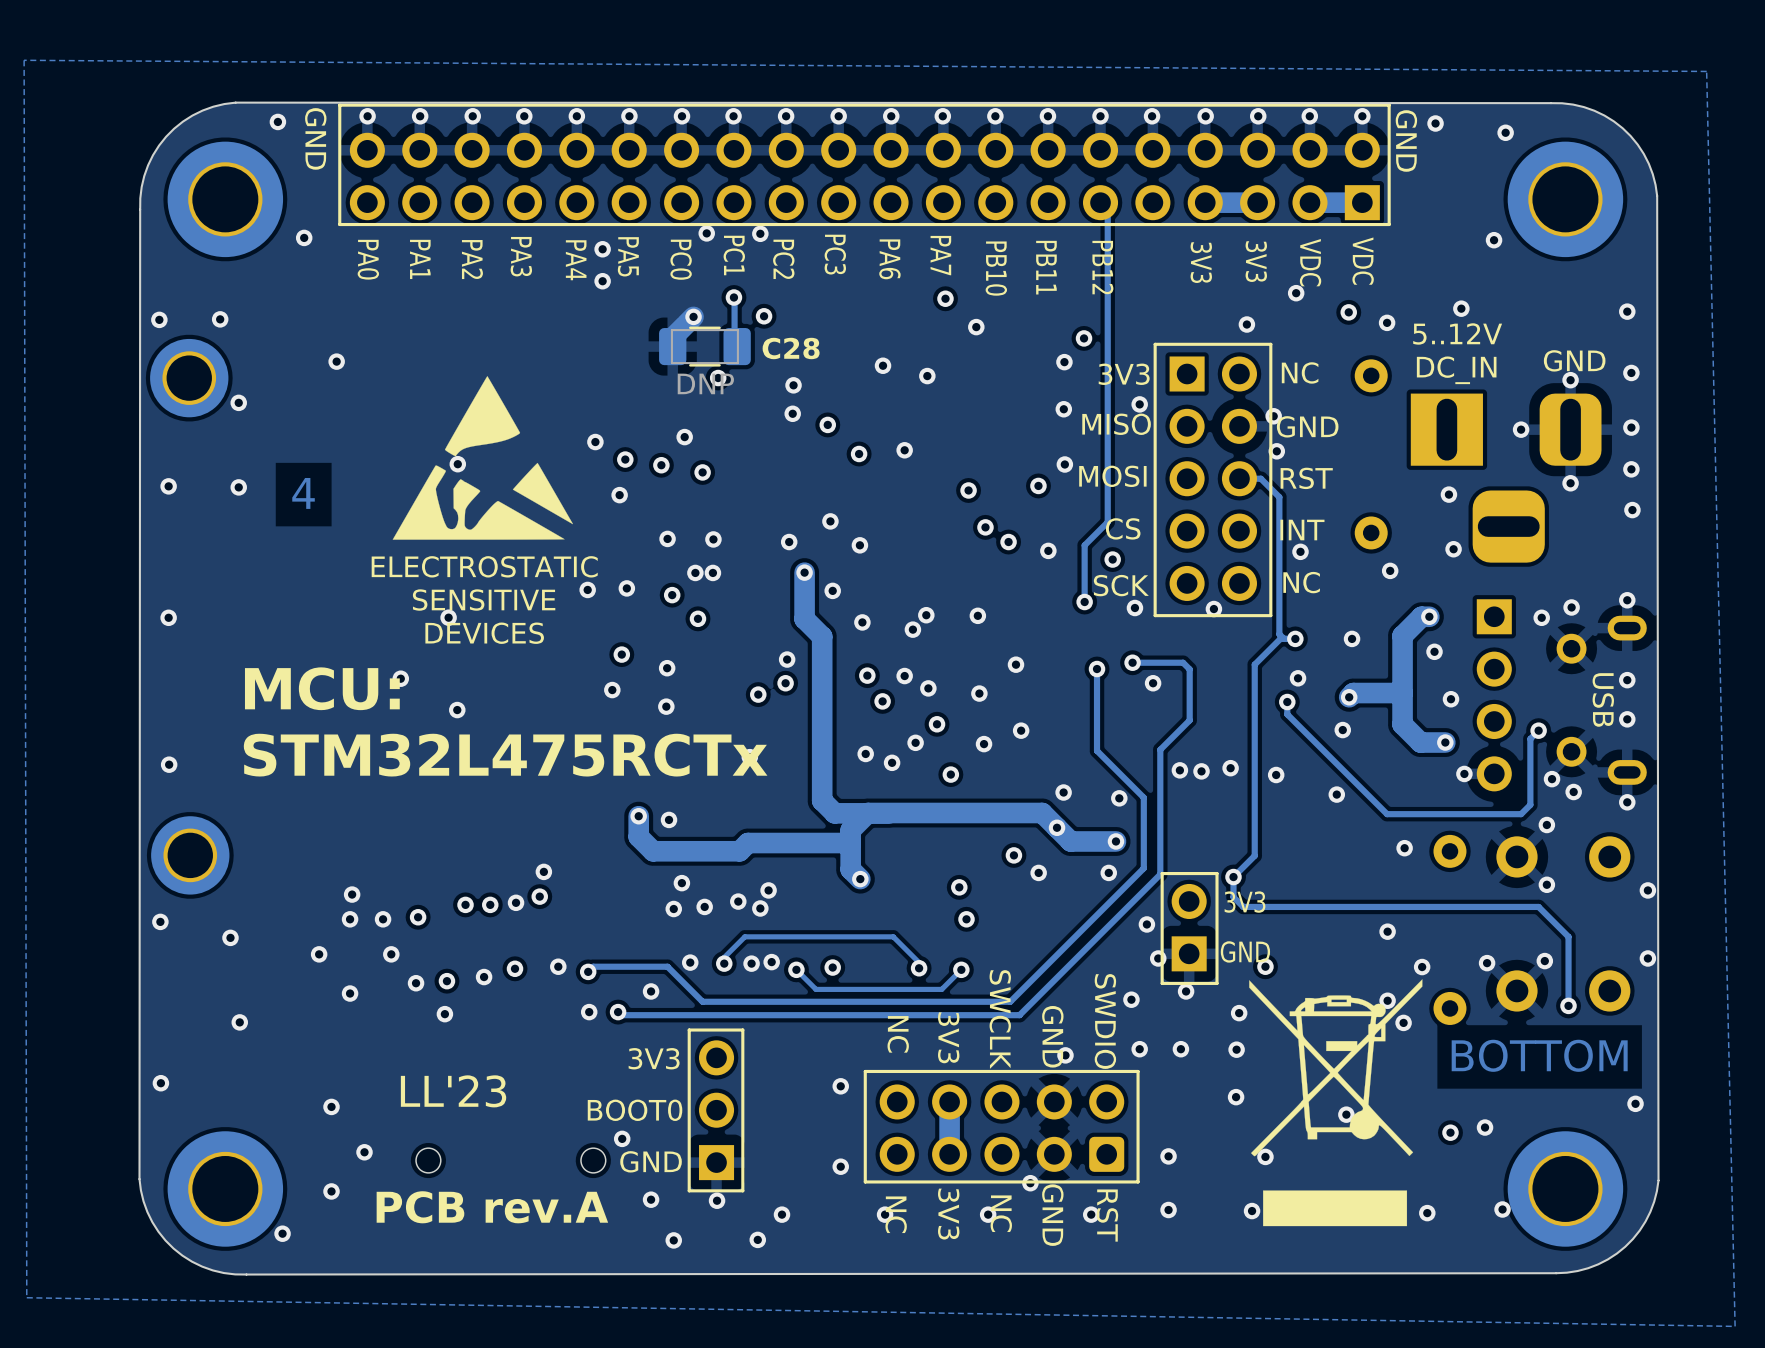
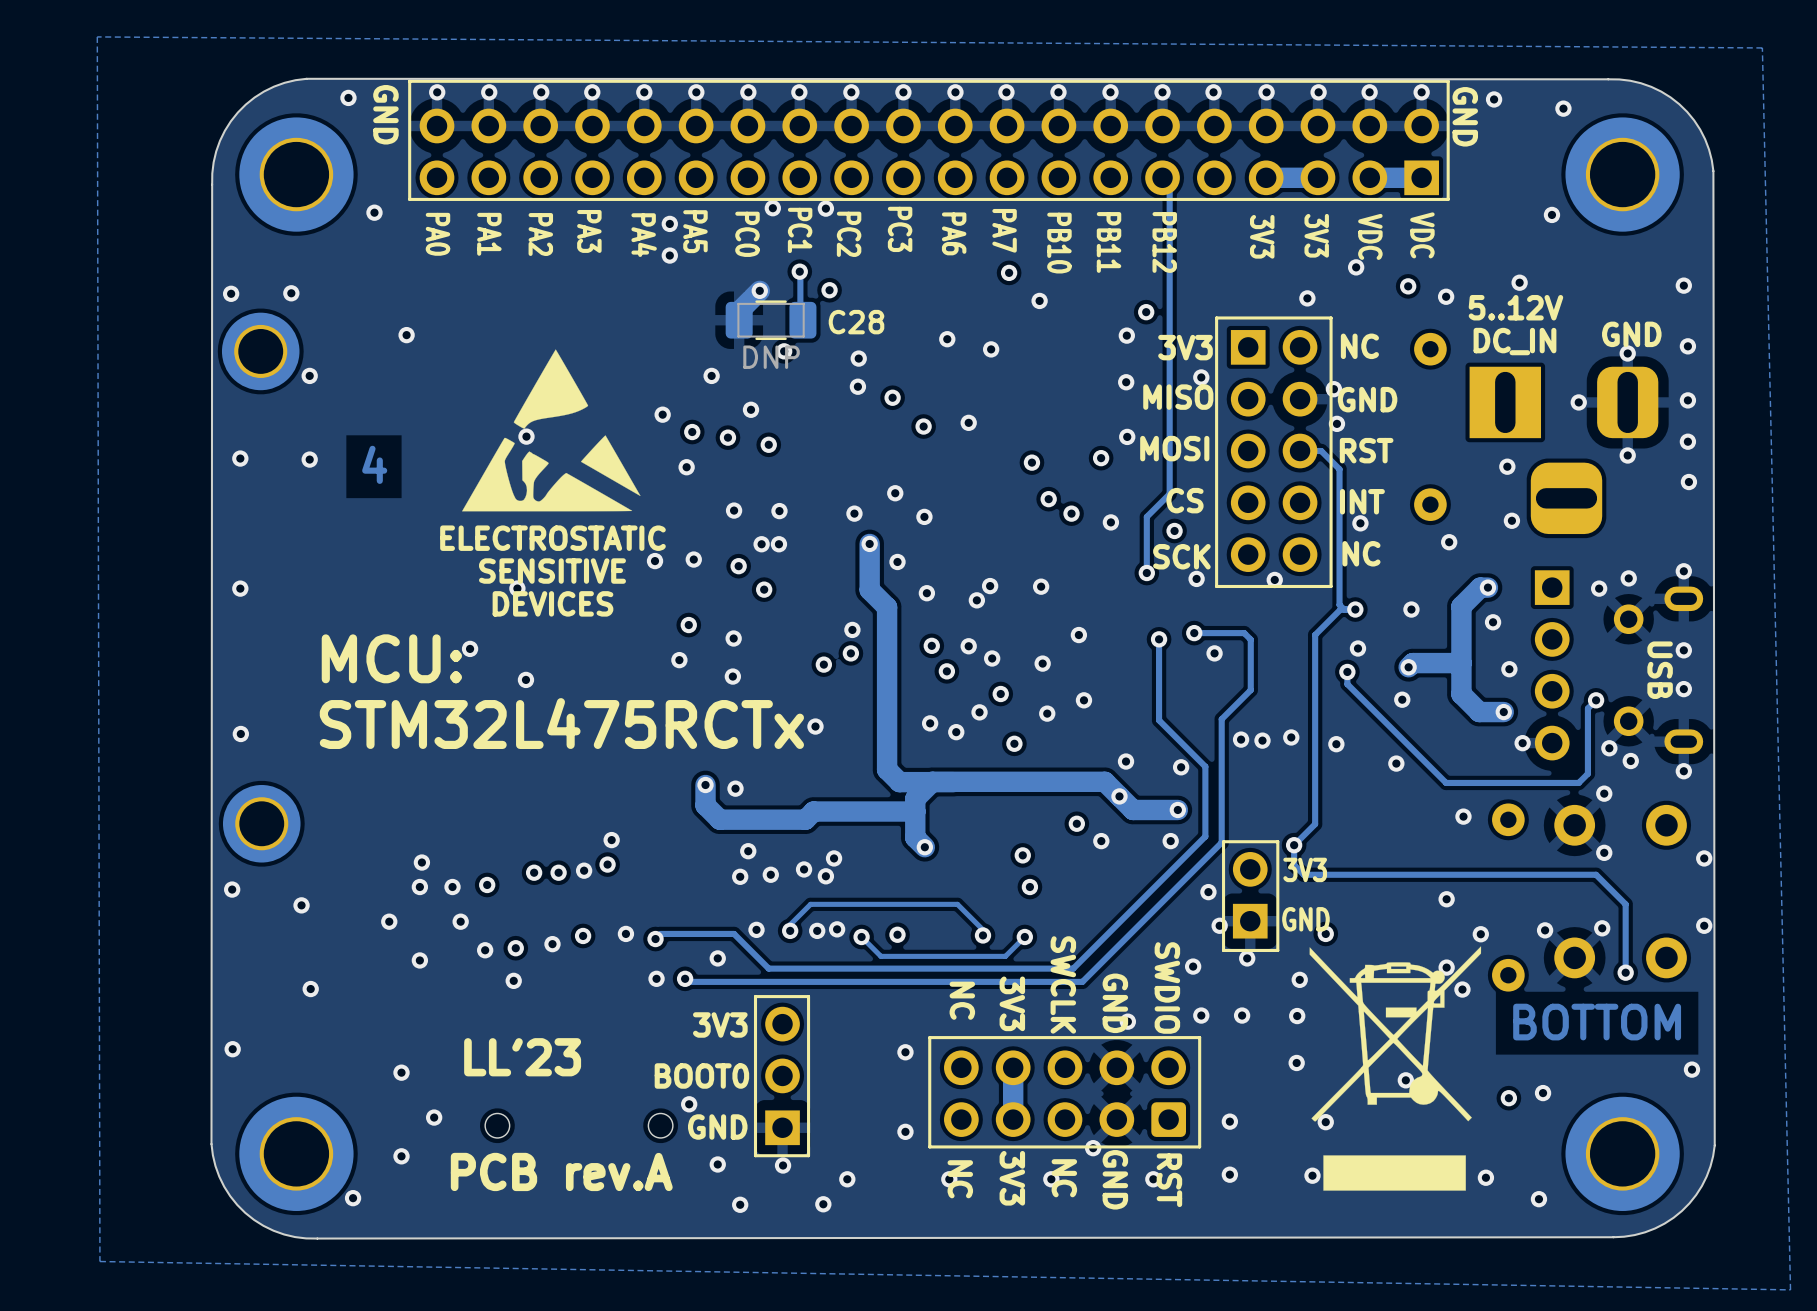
via: none -> (711, 375)
via position: (1502, 1209) -> (1538, 1199)

